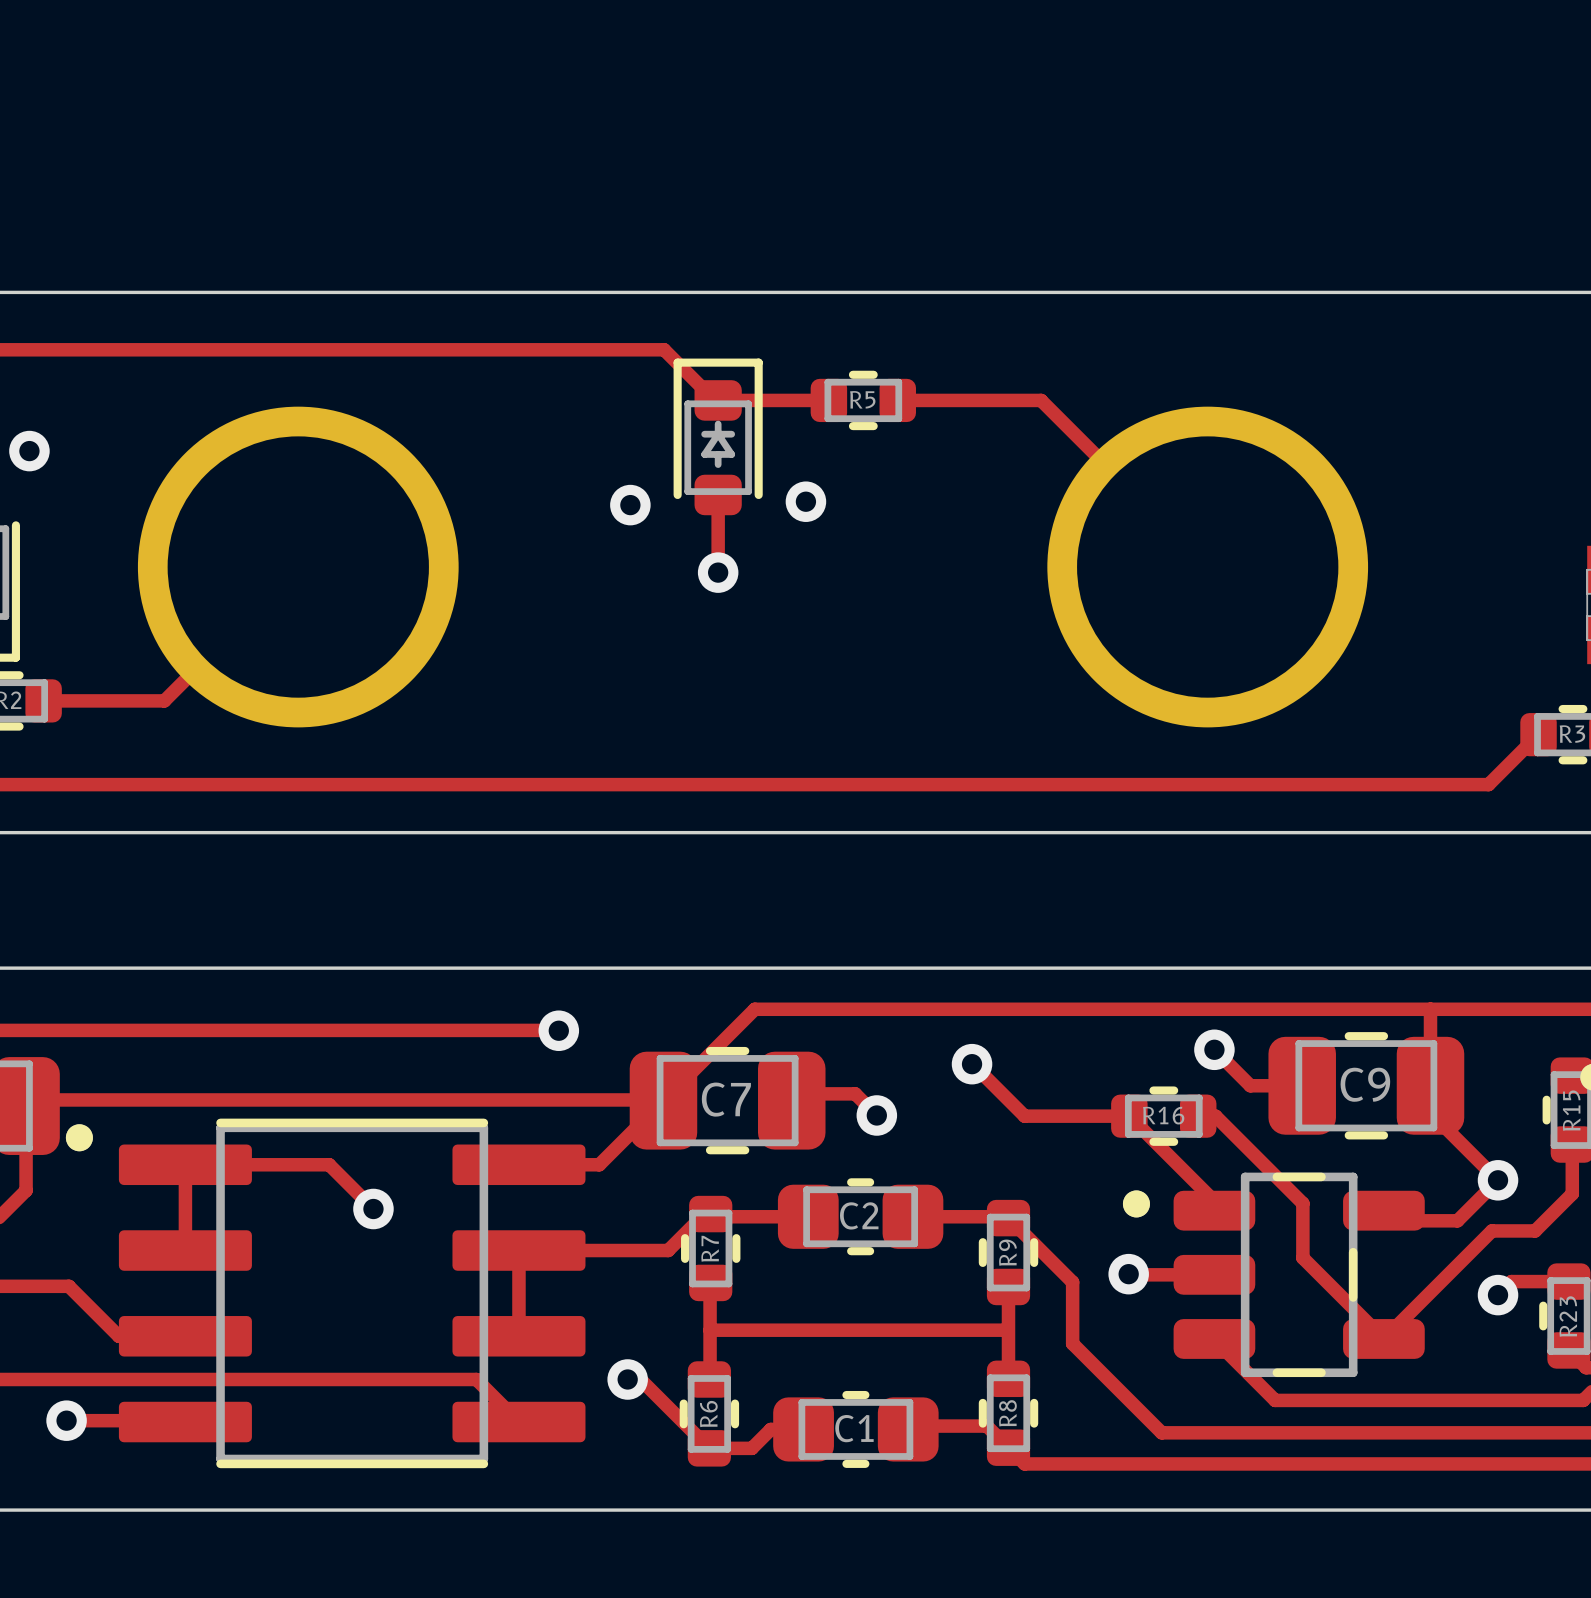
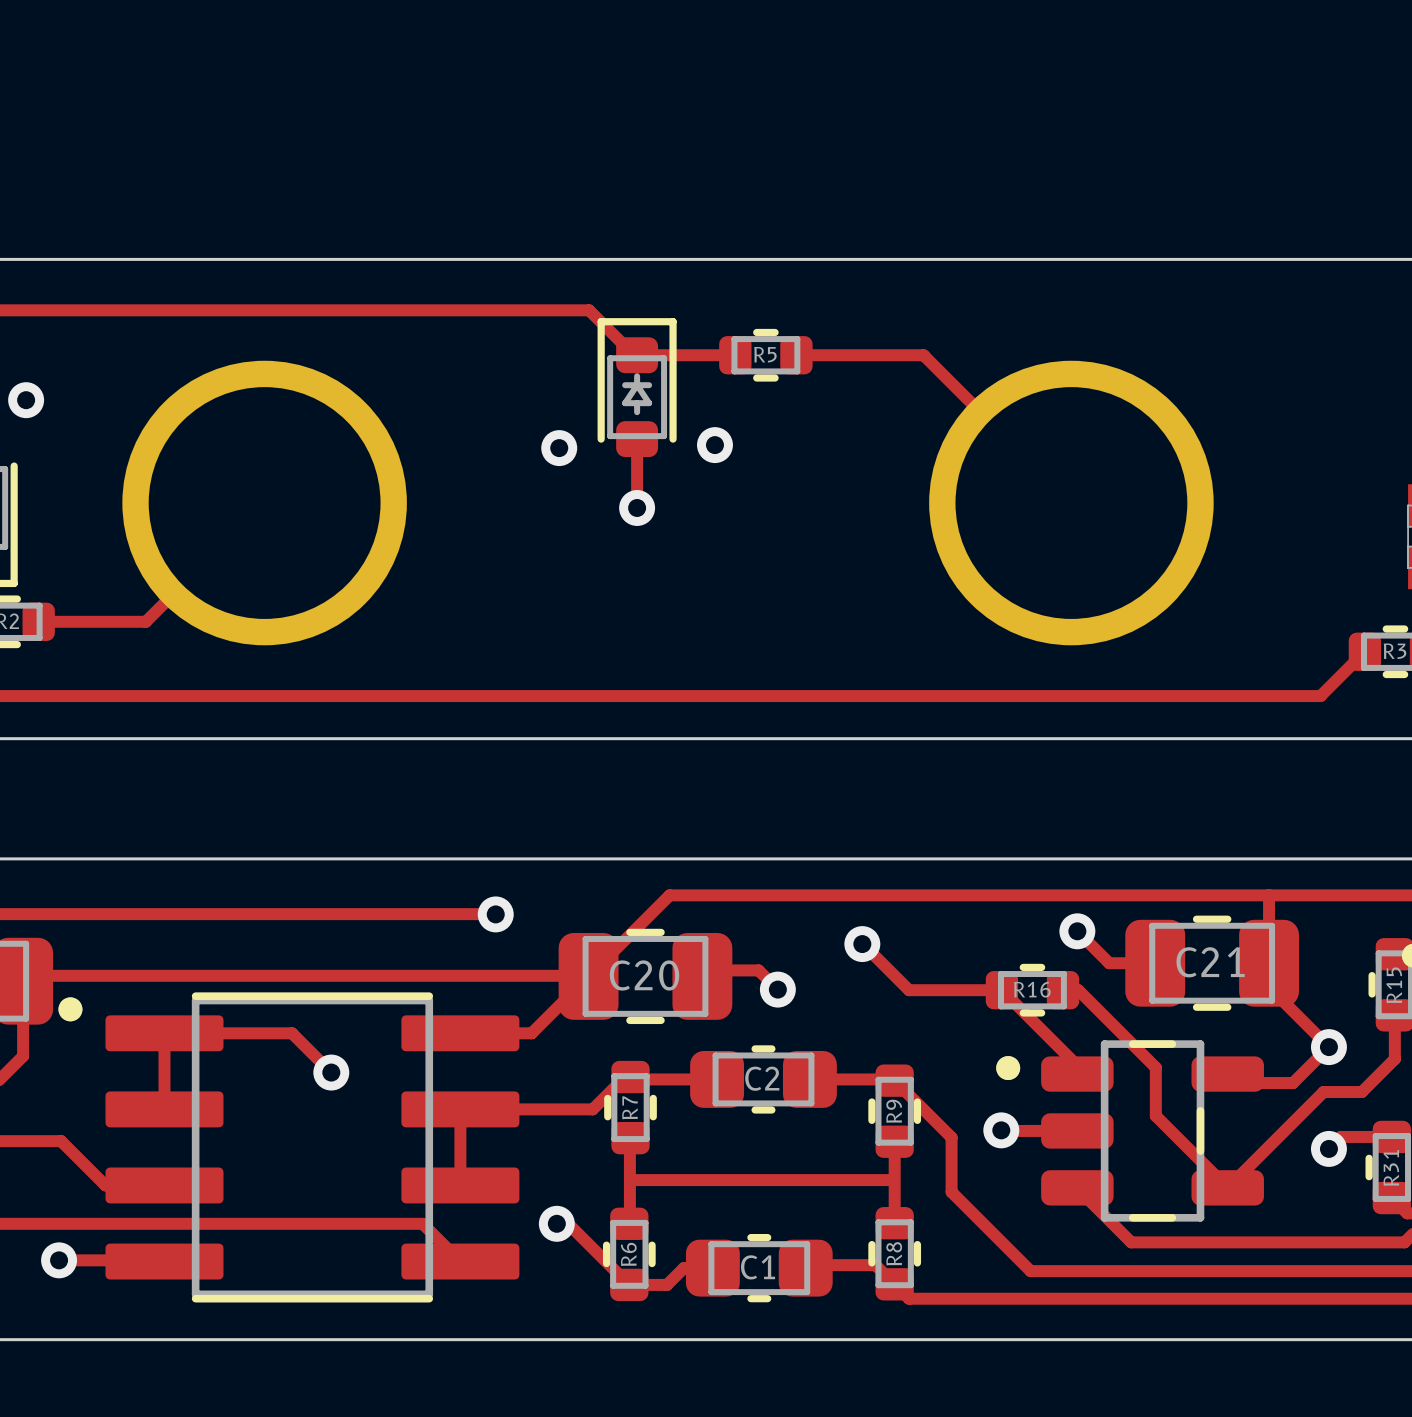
C9 name: C9 (1365, 1084) -> C21 (1210, 962)
C7 name: C7 (726, 1099) -> C20 (644, 975)
R23 name: R23 (1568, 1316) -> R31 (1391, 1167)

